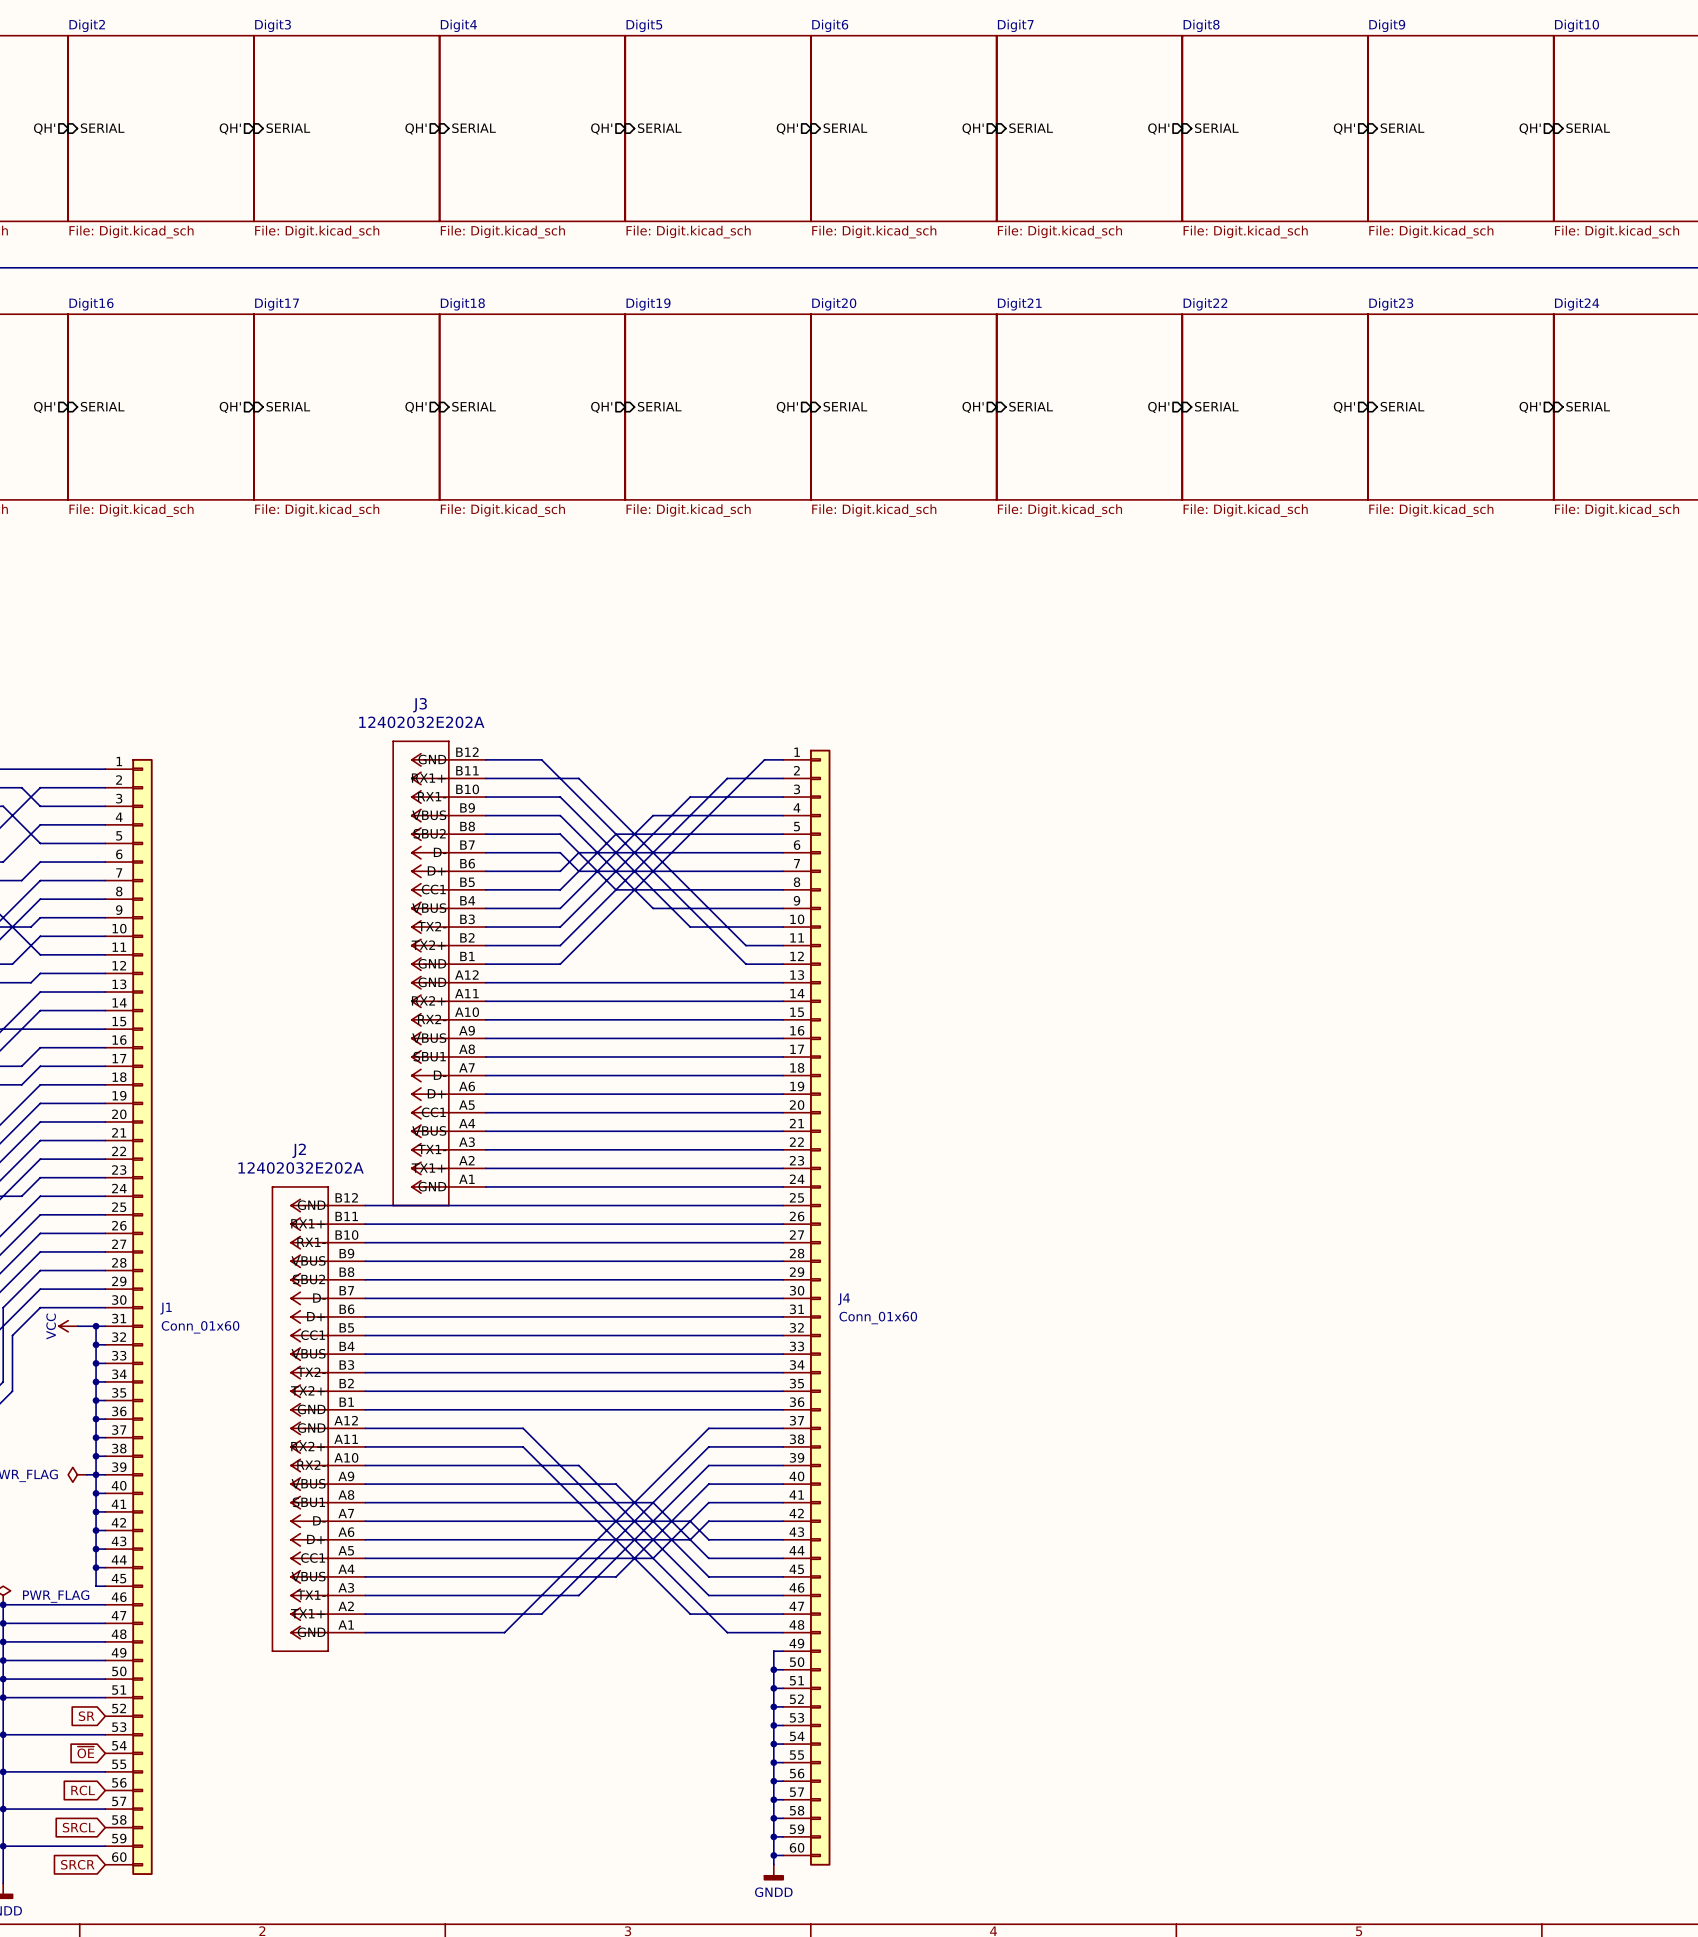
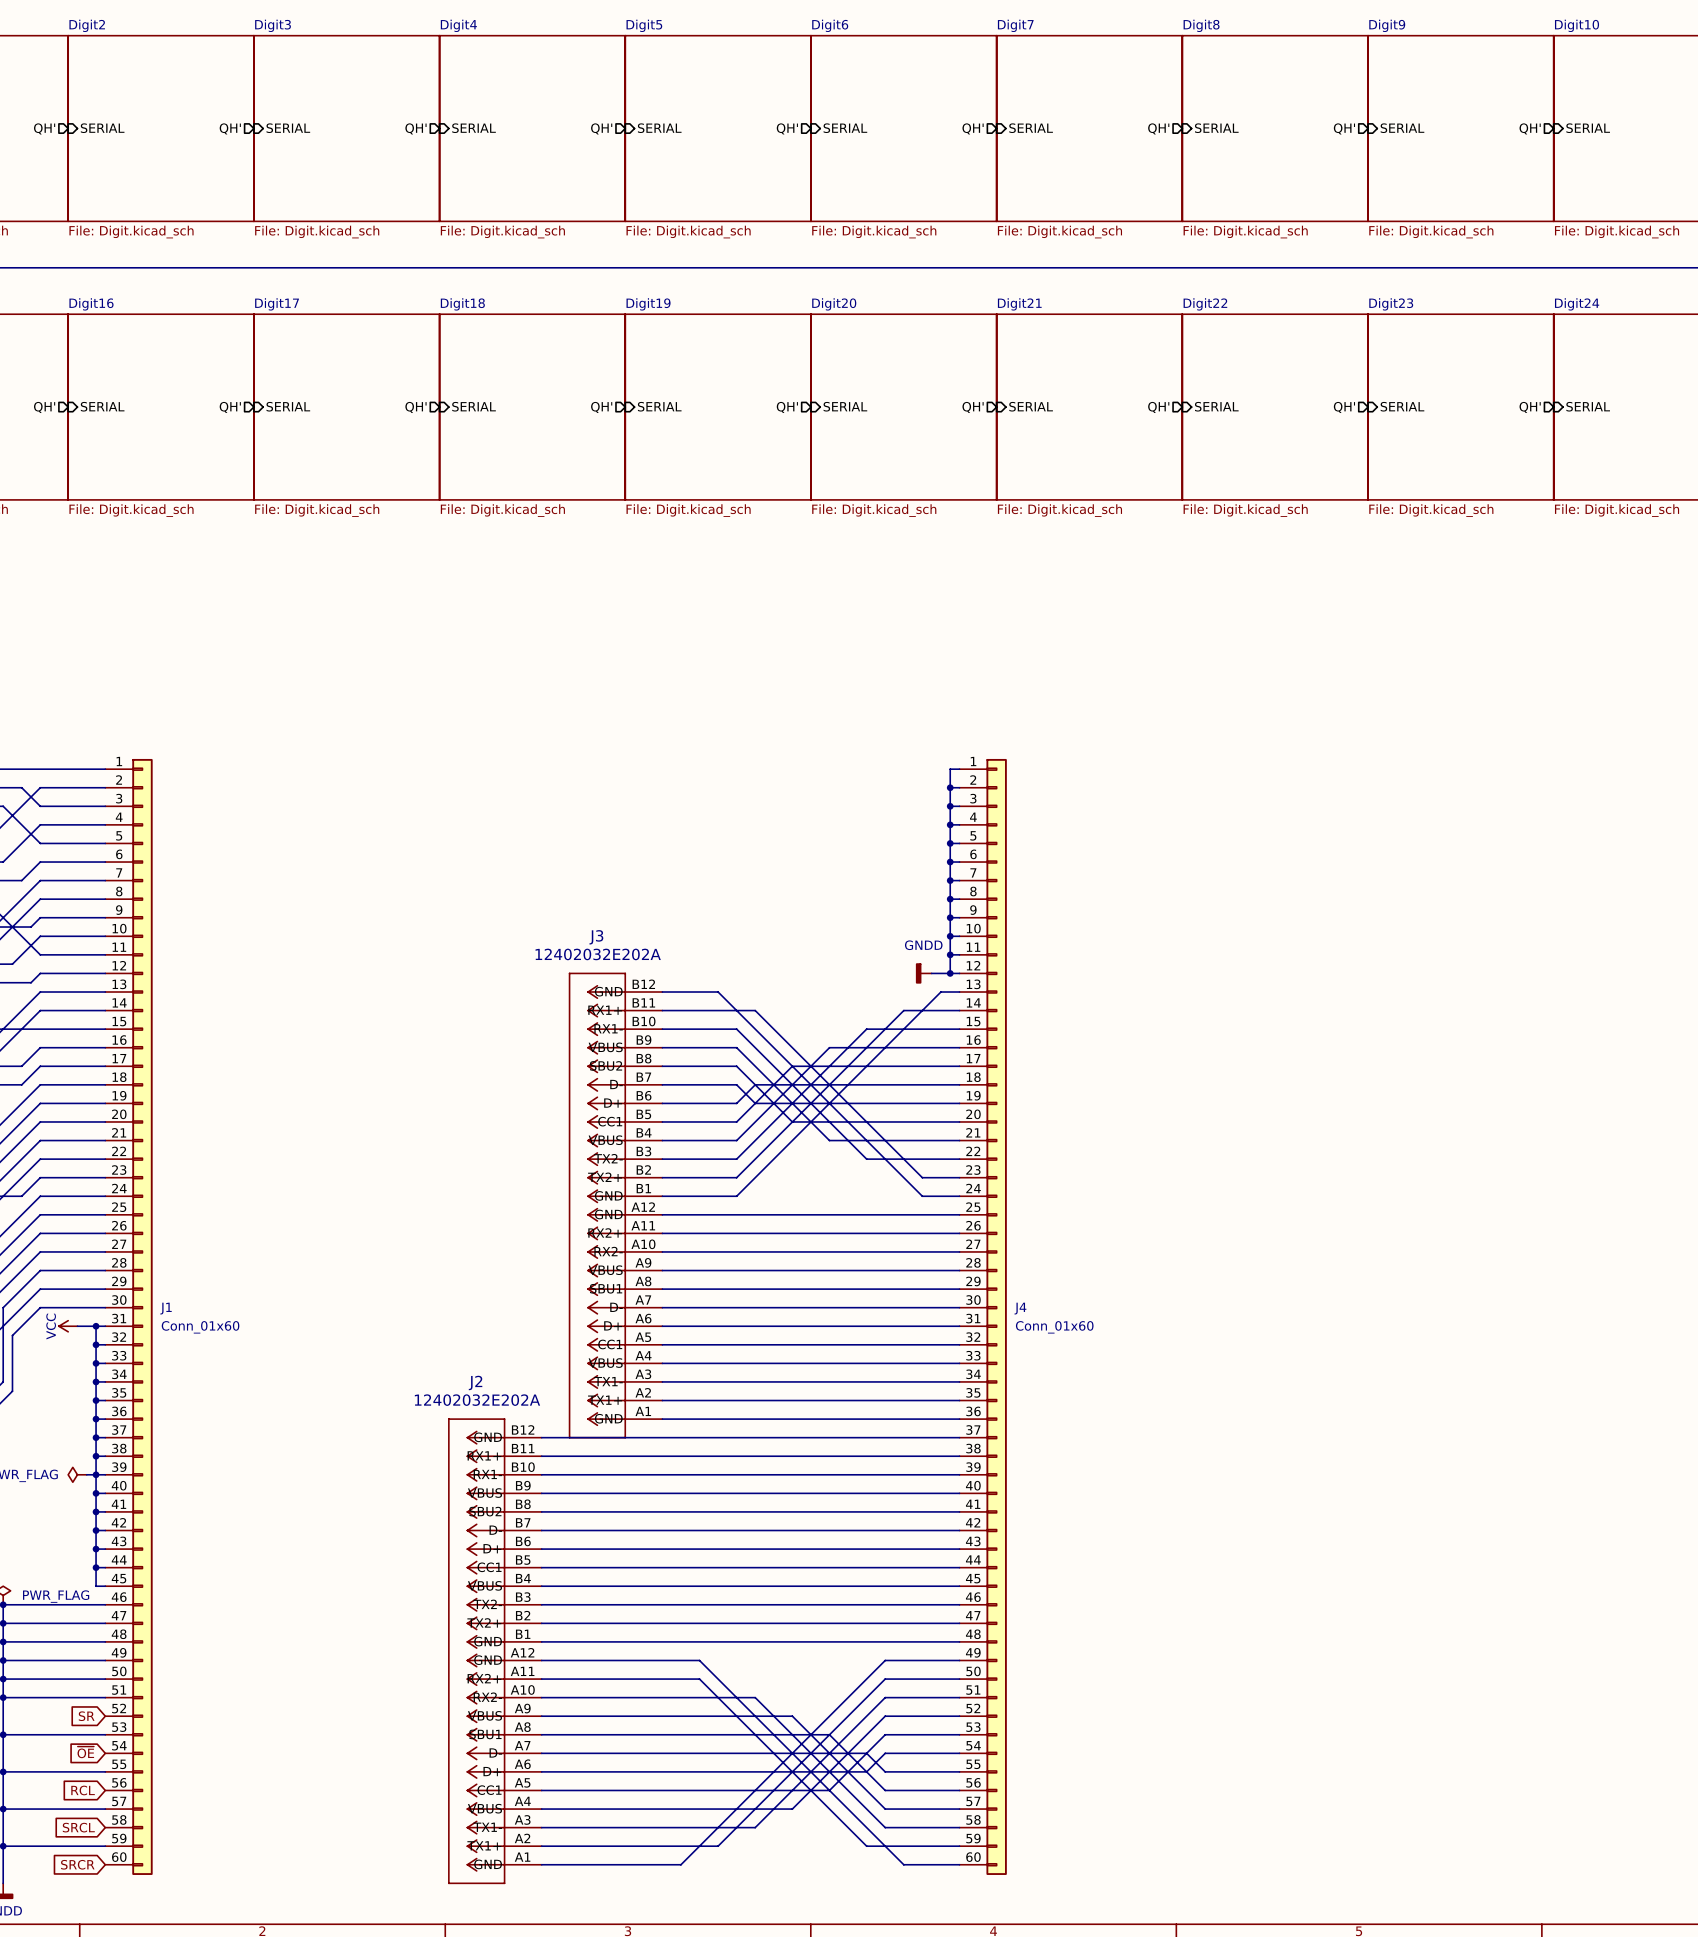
wire: (485, 759) (541, 759) (745, 964) (783, 964) -> none
wire: (783, 759) (764, 759) (560, 964) (485, 964) -> none
wire: none -> (959, 769) (950, 769) (950, 973)
wire: (485, 778) (578, 778) (745, 945) (783, 945) -> none
wire: (783, 778) (727, 778) (560, 945) (485, 945) -> none
wire: none -> (950, 787) (959, 787)
junction: none -> (950, 787)
wire: (485, 797) (560, 797) (690, 927) (783, 927) -> none
wire: (783, 797) (690, 797) (560, 927) (485, 927) -> none
wire: none -> (950, 806) (959, 806)
junction: none -> (950, 806)
wire: (485, 815) (560, 815) (653, 908) (783, 908) -> none
wire: (783, 815) (653, 815) (560, 908) (485, 908) -> none
wire: none -> (950, 824) (959, 824)
junction: none -> (950, 824)
wire: (485, 834) (560, 834) (615, 889) (783, 889) -> none
wire: (783, 834) (615, 834) (560, 889) (485, 889) -> none
wire: none -> (950, 843) (959, 843)
junction: none -> (950, 843)
wire: (485, 852) (560, 852) (578, 871) (783, 871) -> none
wire: (783, 852) (578, 852) (560, 871) (485, 871) -> none
wire: none -> (950, 862) (959, 862)
junction: none -> (950, 862)
wire: none -> (950, 880) (959, 880)
junction: none -> (950, 880)
wire: none -> (950, 899) (959, 899)
junction: none -> (950, 899)
wire: none -> (950, 917) (959, 917)
junction: none -> (950, 917)
wire: none -> (950, 936) (959, 936)
junction: none -> (950, 936)
wire: none -> (950, 954) (959, 954)
junction: none -> (950, 954)
J3 position: (439, 973) -> (615, 1205)
power symbol: none -> GNDD (923, 973)
wire: none -> (931, 973) (959, 973)
junction: none -> (950, 973)
wire: (485, 982) (783, 982) -> none
wire: none -> (662, 992) (718, 992) (922, 1196) (959, 1196)
wire: none -> (959, 992) (940, 992) (736, 1196) (662, 1196)
wire: (485, 1001) (783, 1001) -> none
wire: none -> (662, 1010) (755, 1010) (922, 1177) (959, 1177)
wire: none -> (959, 1010) (903, 1010) (736, 1177) (662, 1177)
wire: (485, 1019) (783, 1019) -> none
wire: none -> (662, 1029) (736, 1029) (866, 1159) (959, 1159)
wire: none -> (959, 1029) (866, 1029) (736, 1159) (662, 1159)
wire: (485, 1038) (783, 1038) -> none
wire: none -> (662, 1047) (736, 1047) (829, 1140) (959, 1140)
wire: none -> (959, 1047) (829, 1047) (736, 1140) (662, 1140)
wire: (485, 1056) (783, 1056) -> none
wire: none -> (662, 1066) (736, 1066) (792, 1121) (959, 1121)
wire: none -> (959, 1066) (792, 1066) (736, 1121) (662, 1121)
wire: (485, 1075) (783, 1075) -> none
wire: none -> (662, 1084) (736, 1084) (755, 1103) (959, 1103)
wire: none -> (959, 1084) (755, 1084) (736, 1103) (662, 1103)
wire: (485, 1094) (783, 1094) -> none
wire: (485, 1112) (783, 1112) -> none
wire: (485, 1131) (783, 1131) -> none
wire: (485, 1149) (783, 1149) -> none
wire: (485, 1168) (783, 1168) -> (662, 1214) (959, 1214)
wire: (485, 1186) (783, 1186) -> (662, 1233) (959, 1233)
wire: (365, 1205) (783, 1205) -> none
wire: (365, 1224) (783, 1224) -> none
wire: (365, 1242) (783, 1242) -> none
wire: none -> (662, 1251) (959, 1251)
wire: (365, 1261) (783, 1261) -> none
wire: none -> (662, 1270) (959, 1270)
wire: (365, 1279) (783, 1279) -> none
wire: none -> (662, 1289) (959, 1289)
wire: (365, 1298) (783, 1298) -> none
wire: none -> (662, 1307) (959, 1307)
J4 position: (806, 1307) -> (983, 1316)
wire: (365, 1316) (783, 1316) -> none
wire: none -> (662, 1326) (959, 1326)
wire: (365, 1335) (783, 1335) -> none
wire: none -> (662, 1344) (959, 1344)
wire: (365, 1354) (783, 1354) -> none
wire: none -> (662, 1363) (959, 1363)
wire: (365, 1372) (783, 1372) -> none
wire: none -> (662, 1381) (959, 1381)
wire: (365, 1391) (783, 1391) -> (541, 1437) (959, 1437)
wire: none -> (662, 1400) (959, 1400)
wire: (365, 1409) (783, 1409) -> (541, 1456) (959, 1456)
J2 position: (318, 1419) -> (495, 1651)
wire: none -> (662, 1419) (959, 1419)
wire: (365, 1428) (523, 1428) (727, 1632) (783, 1632) -> none
wire: (783, 1428) (708, 1428) (504, 1632) (365, 1632) -> none
wire: (365, 1446) (523, 1446) (690, 1614) (783, 1614) -> none
wire: (783, 1446) (708, 1446) (541, 1614) (365, 1614) -> none
wire: (365, 1465) (578, 1465) (708, 1595) (783, 1595) -> none
wire: (783, 1465) (708, 1465) (578, 1595) (365, 1595) -> none
wire: none -> (541, 1474) (959, 1474)
wire: (365, 1484) (615, 1484) (708, 1576) (783, 1576) -> none
wire: (783, 1484) (708, 1484) (615, 1576) (365, 1576) -> none
wire: none -> (541, 1493) (959, 1493)
wire: (365, 1502) (653, 1502) (708, 1558) (783, 1558) -> none
wire: (783, 1502) (708, 1502) (653, 1558) (365, 1558) -> none
wire: none -> (541, 1511) (959, 1511)
wire: (365, 1521) (690, 1521) (708, 1539) (783, 1539) -> none
wire: (783, 1521) (708, 1521) (690, 1539) (365, 1539) -> none
wire: none -> (541, 1530) (959, 1530)
wire: none -> (541, 1549) (959, 1549)
wire: none -> (541, 1567) (959, 1567)
wire: none -> (541, 1586) (959, 1586)
wire: none -> (541, 1604) (959, 1604)
wire: none -> (541, 1623) (959, 1623)
wire: none -> (541, 1641) (959, 1641)
wire: (783, 1651) (773, 1651) (773, 1864) -> none
wire: none -> (541, 1660) (699, 1660) (903, 1864) (959, 1864)
wire: none -> (959, 1660) (885, 1660) (680, 1864) (541, 1864)
wire: (773, 1669) (783, 1669) -> none
junction: (773, 1669) -> none
wire: none -> (541, 1679) (699, 1679) (866, 1846) (959, 1846)
wire: none -> (959, 1679) (885, 1679) (718, 1846) (541, 1846)
wire: (773, 1688) (783, 1688) -> none
junction: (773, 1688) -> none
wire: none -> (541, 1697) (755, 1697) (885, 1827) (959, 1827)
wire: none -> (959, 1697) (885, 1697) (755, 1827) (541, 1827)
wire: (773, 1706) (783, 1706) -> none
junction: (773, 1706) -> none
wire: none -> (541, 1716) (792, 1716) (885, 1809) (959, 1809)
wire: none -> (959, 1716) (885, 1716) (792, 1809) (541, 1809)
wire: (773, 1725) (783, 1725) -> none
junction: (773, 1725) -> none
wire: none -> (541, 1734) (829, 1734) (885, 1790) (959, 1790)
wire: none -> (959, 1734) (885, 1734) (829, 1790) (541, 1790)
wire: (773, 1744) (783, 1744) -> none
junction: (773, 1744) -> none
wire: none -> (541, 1753) (866, 1753) (885, 1771) (959, 1771)
wire: none -> (959, 1753) (885, 1753) (866, 1771) (541, 1771)
wire: (773, 1762) (783, 1762) -> none
junction: (773, 1762) -> none
wire: (773, 1781) (783, 1781) -> none
junction: (773, 1781) -> none
wire: (773, 1799) (783, 1799) -> none
junction: (773, 1799) -> none
wire: (773, 1818) (783, 1818) -> none
junction: (773, 1818) -> none
wire: (773, 1836) (783, 1836) -> none
junction: (773, 1836) -> none
wire: (773, 1855) (783, 1855) -> none
junction: (773, 1855) -> none
power symbol: GNDD (773, 1872) -> none

